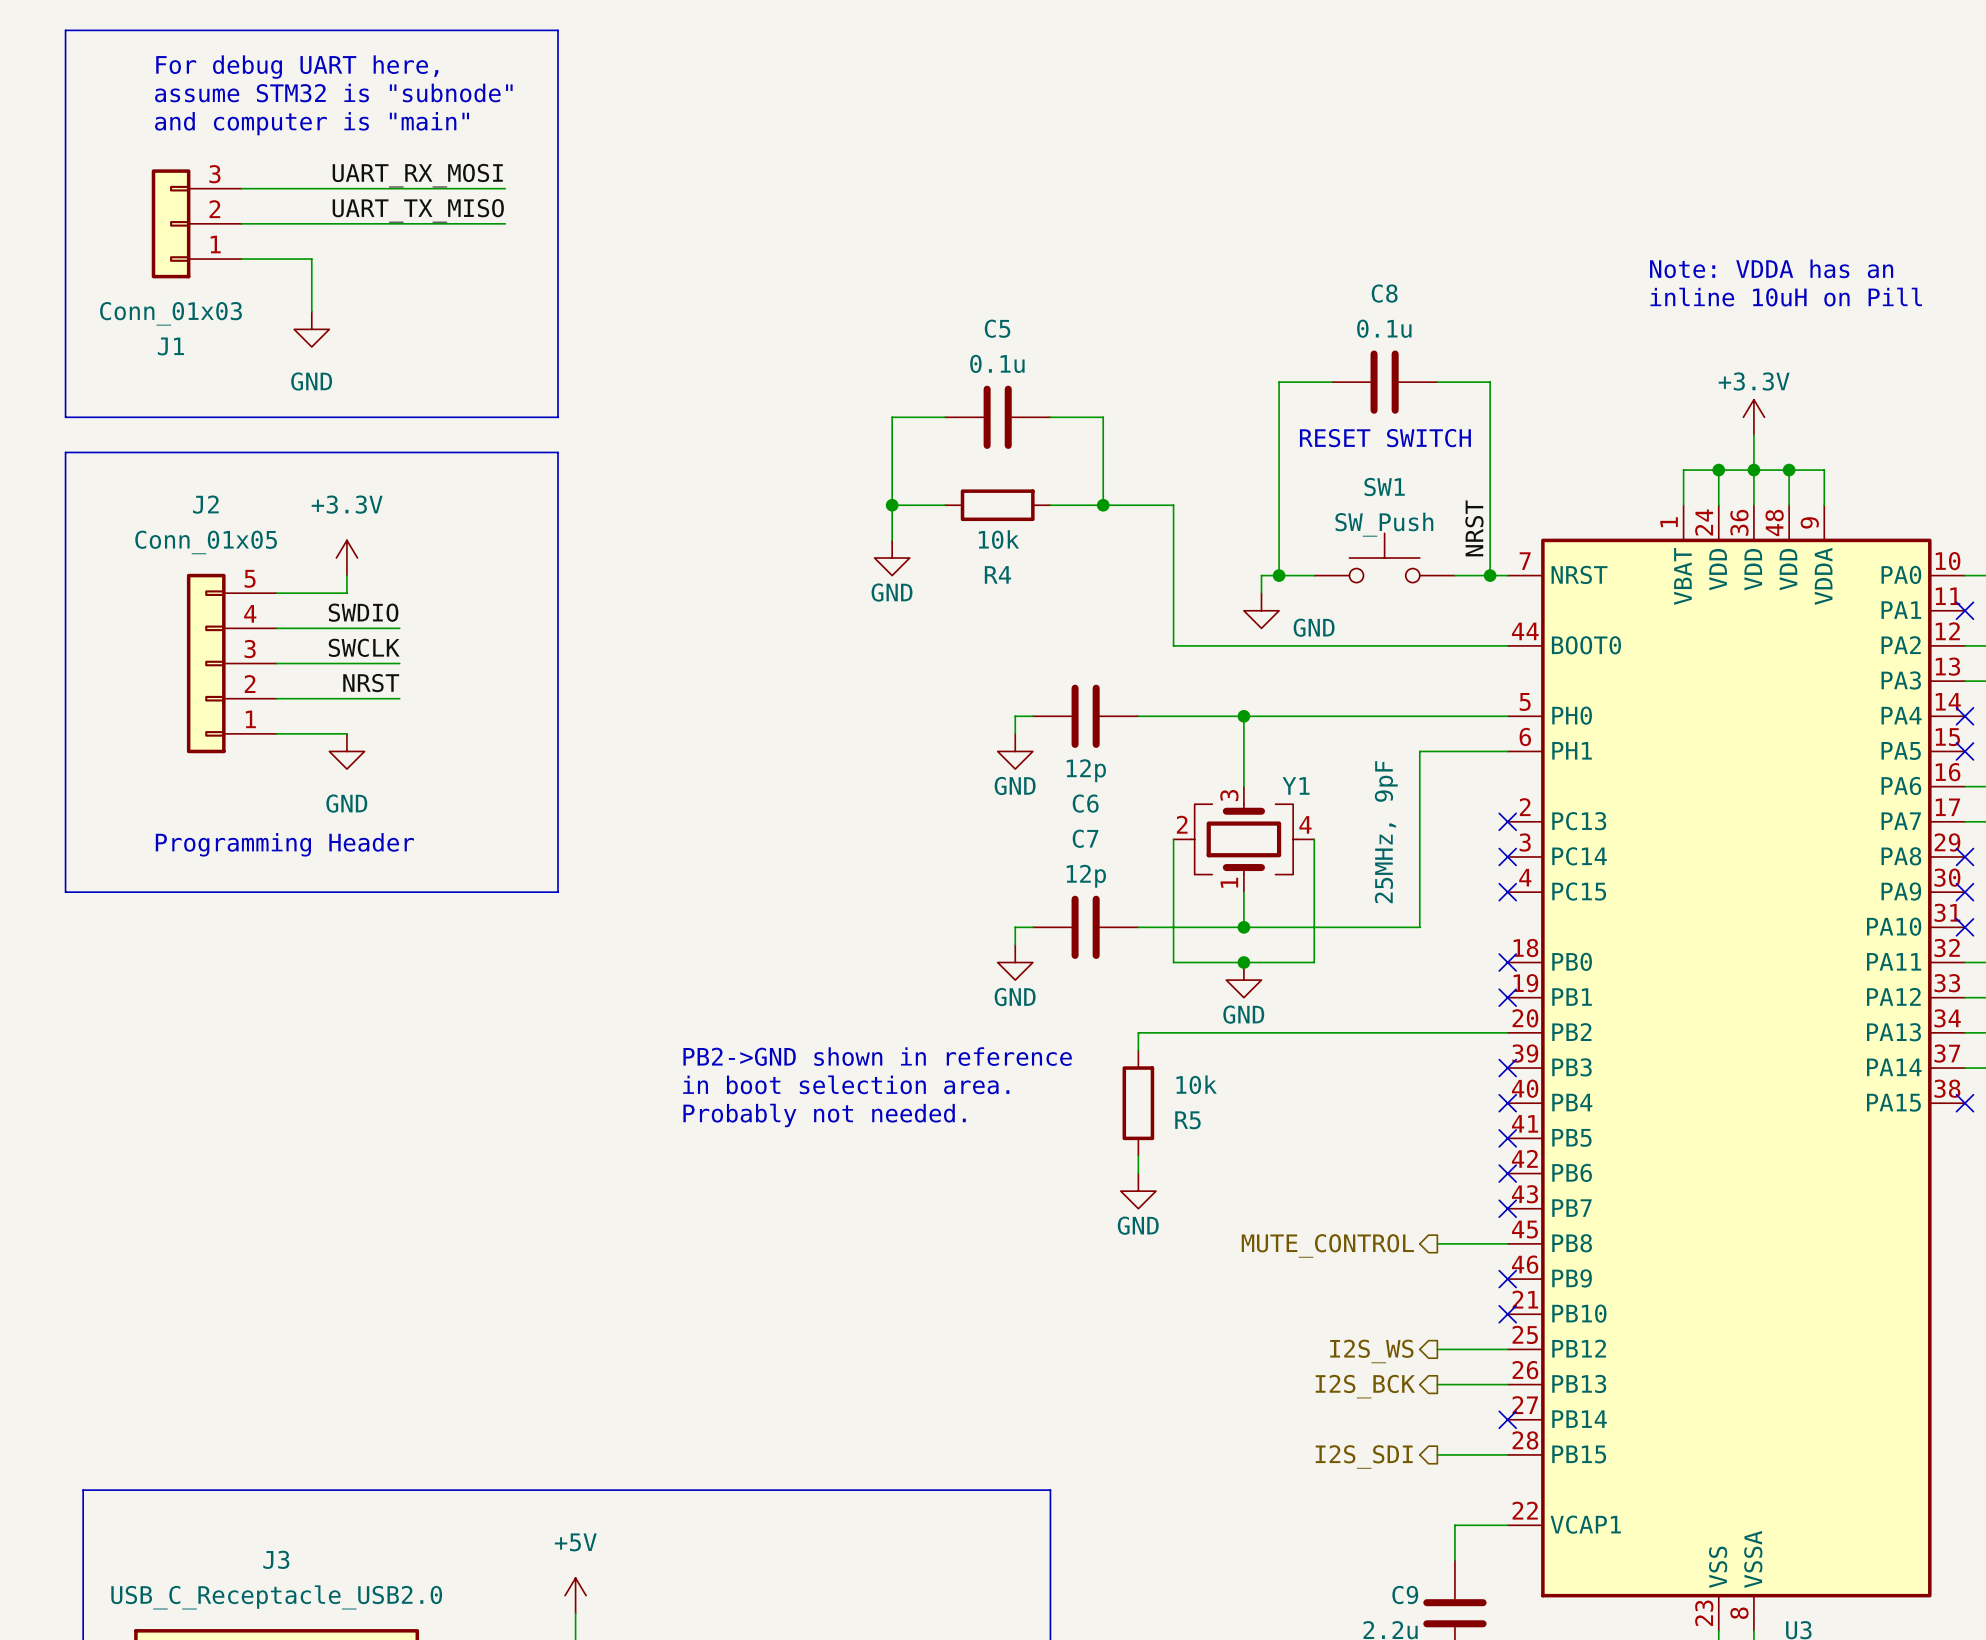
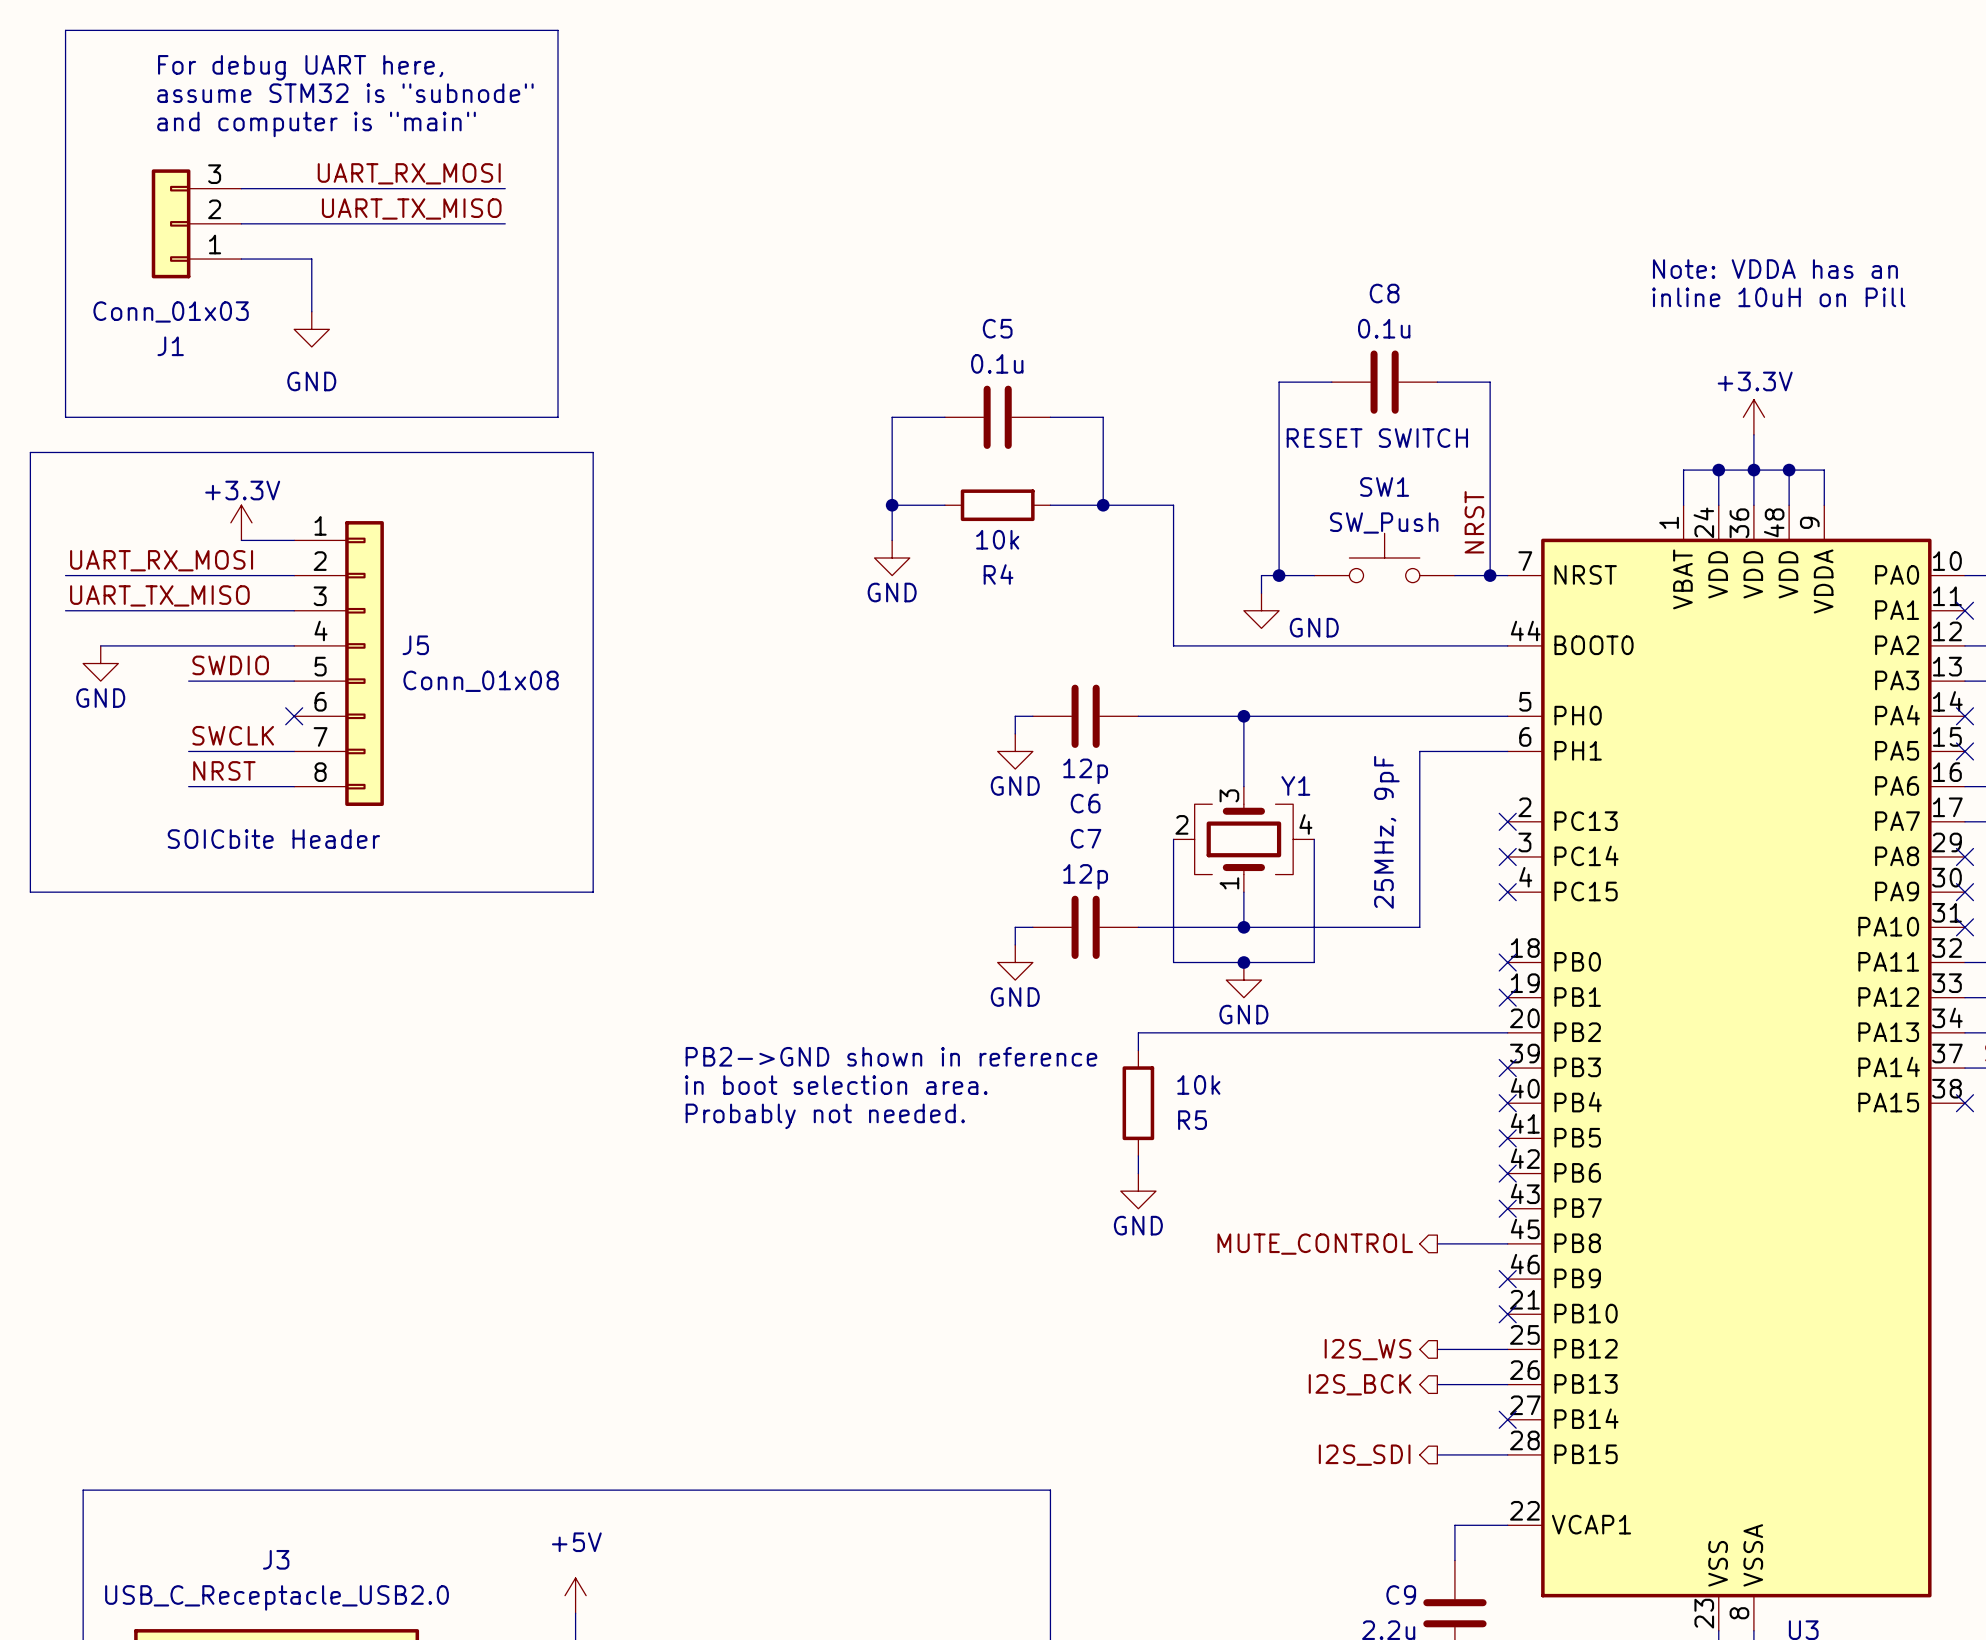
line: (65, 452) (65, 892) -> (65, 452) (30, 452) (30, 892) (65, 892)
line: (558, 452) (558, 892) -> (558, 452) (593, 452) (593, 892) (558, 892)
power symbol text position: +3.3V (347, 504) -> +3.3V (242, 490)
wire: none -> (241, 540) (294, 540)
power symbol position: +3.3V (346, 558) -> +3.3V (241, 522)
label: none -> UART_RX_MOSI (161, 560)
wire: none -> (65, 575) (294, 575)
wire: (346, 575) (346, 593) (276, 593) -> none
label: none -> UART_TX_MISO (159, 595)
wire: none -> (65, 610) (294, 610)
label position: SWDIO (363, 612) -> SWDIO (230, 665)
wire: (276, 628) (399, 628) -> none
wire: none -> (100, 645) (294, 645)
label position: SWCLK (364, 647) -> SWCLK (233, 735)
J2: Conn_01x05 (231, 663) -> none
wire: (276, 663) (399, 663) -> none
J5: none -> Conn_01x08 (339, 663)
wire: none -> (188, 681) (294, 681)
label position: NRST (371, 683) -> NRST (224, 770)
wire: (276, 698) (399, 698) -> none
no-connect mark: none -> (294, 716)
wire: (276, 733) (346, 733) -> none
wire: none -> (188, 751) (294, 751)
power symbol position: GND (346, 751) -> GND (100, 663)
wire: none -> (188, 786) (294, 786)
power symbol text position: GND (346, 803) -> GND (100, 698)
text: Programming Header (284, 844) -> SOICbite Header (273, 839)

